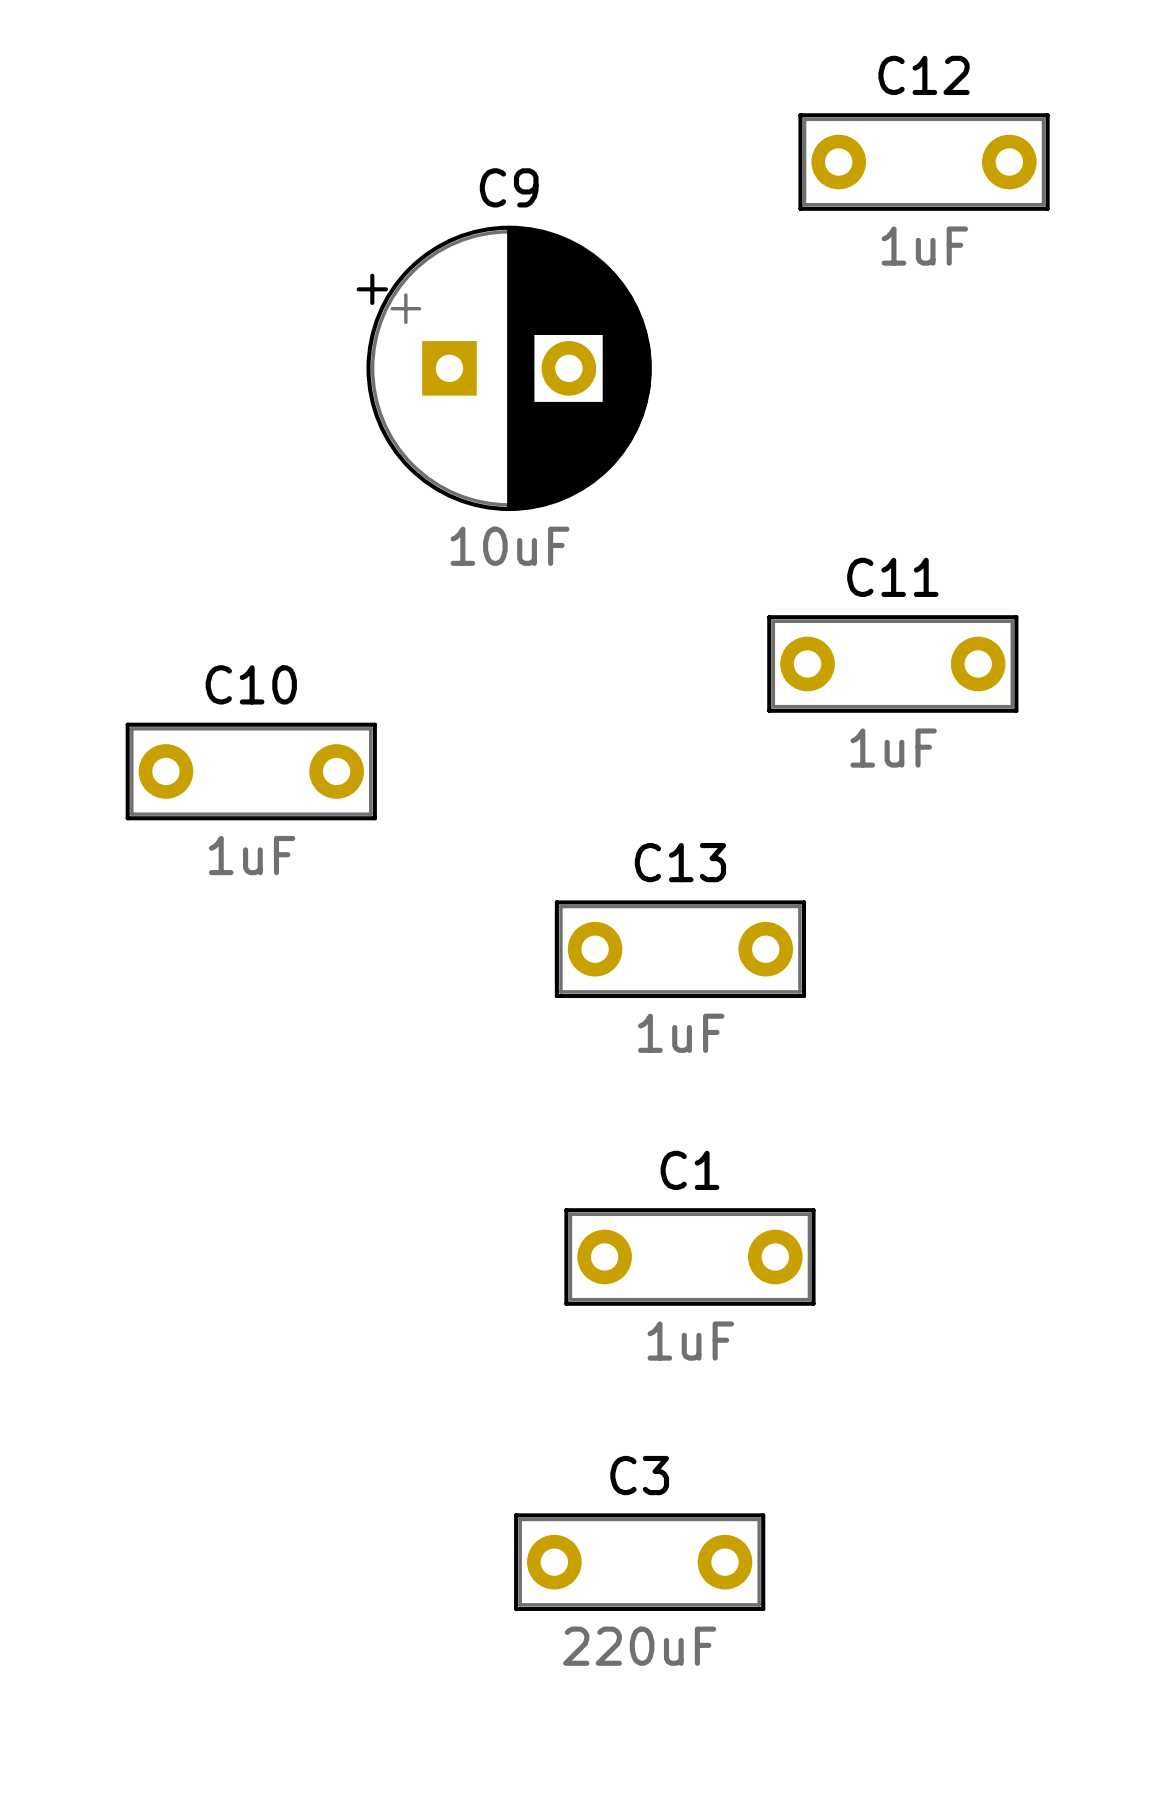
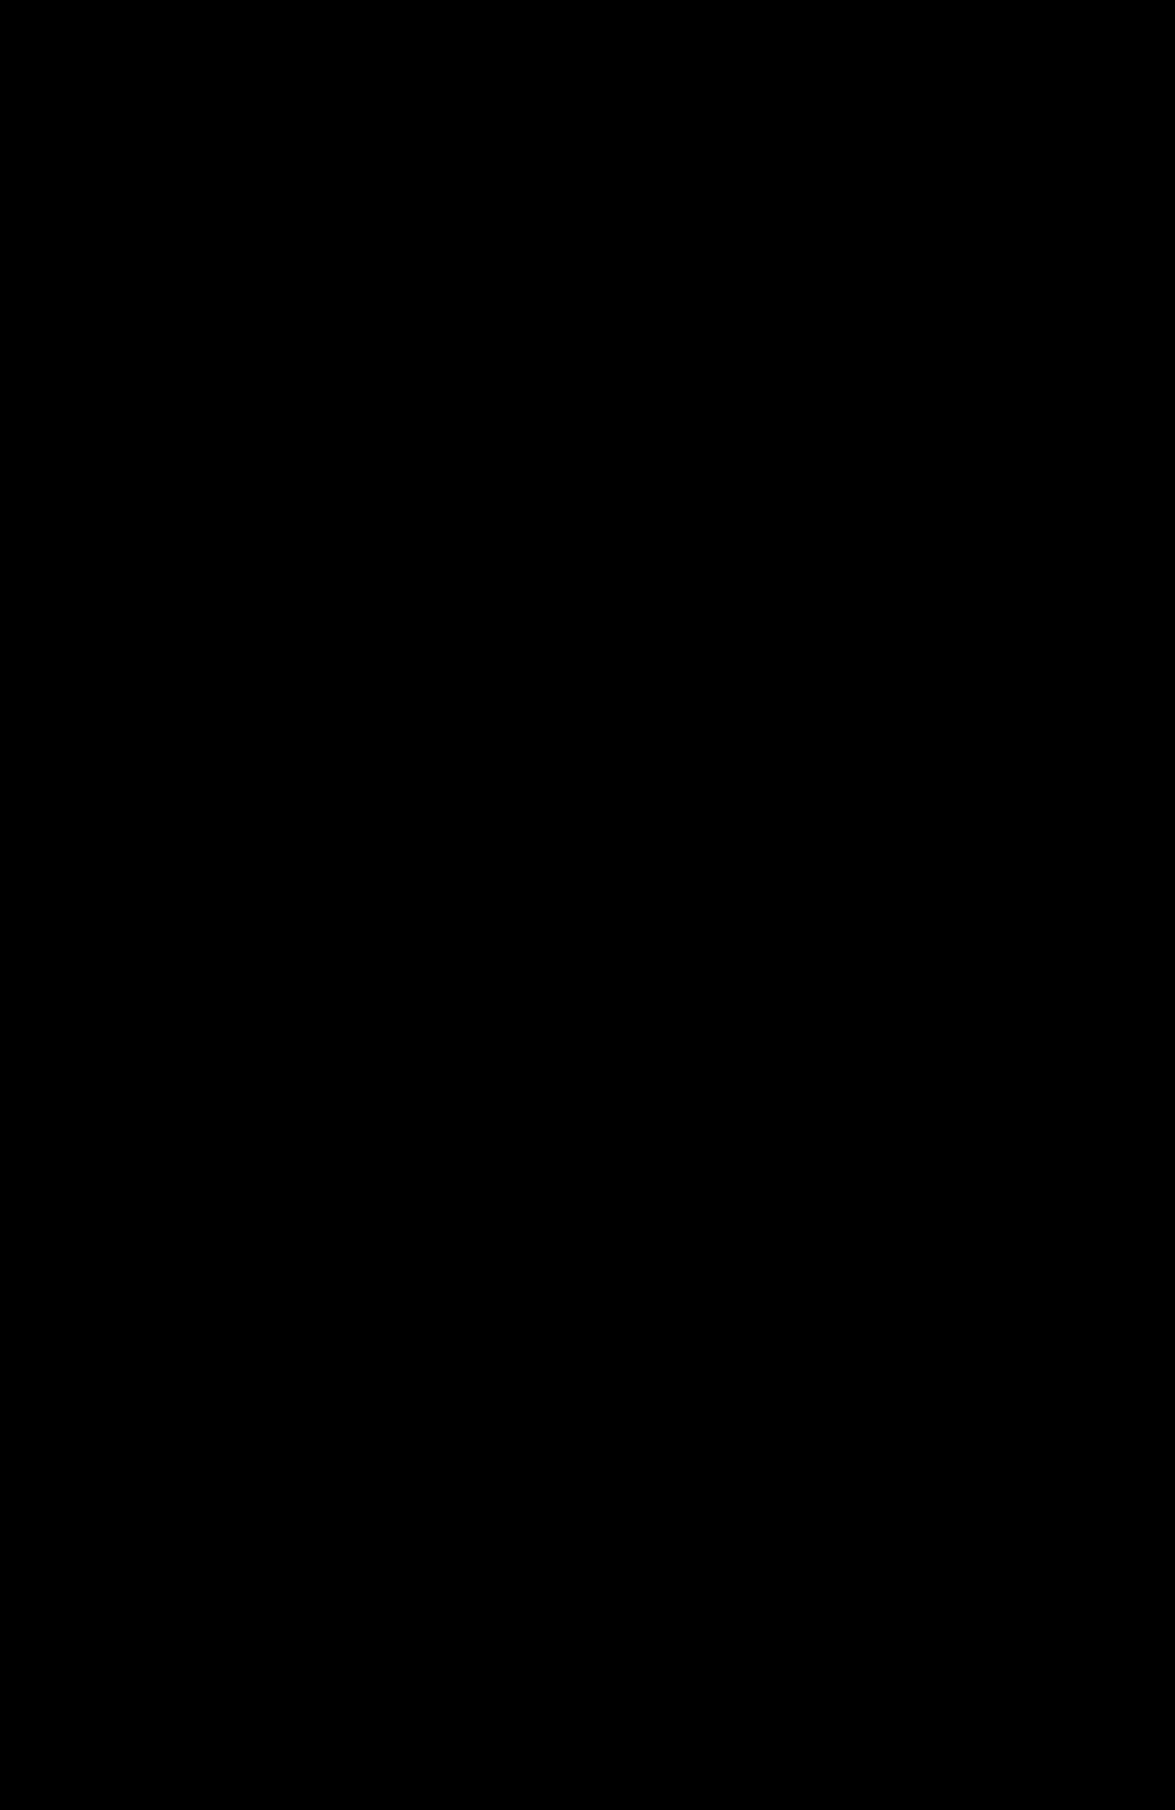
C12: 1uF (924, 162) -> none
C9: 10uF (504, 368) -> none
C11: 1uF (892, 663) -> none
C10: 1uF (251, 771) -> none
C13: 1uF (680, 949) -> none
C1: 1uF (689, 1256) -> none
C3: 220uF (639, 1562) -> none

